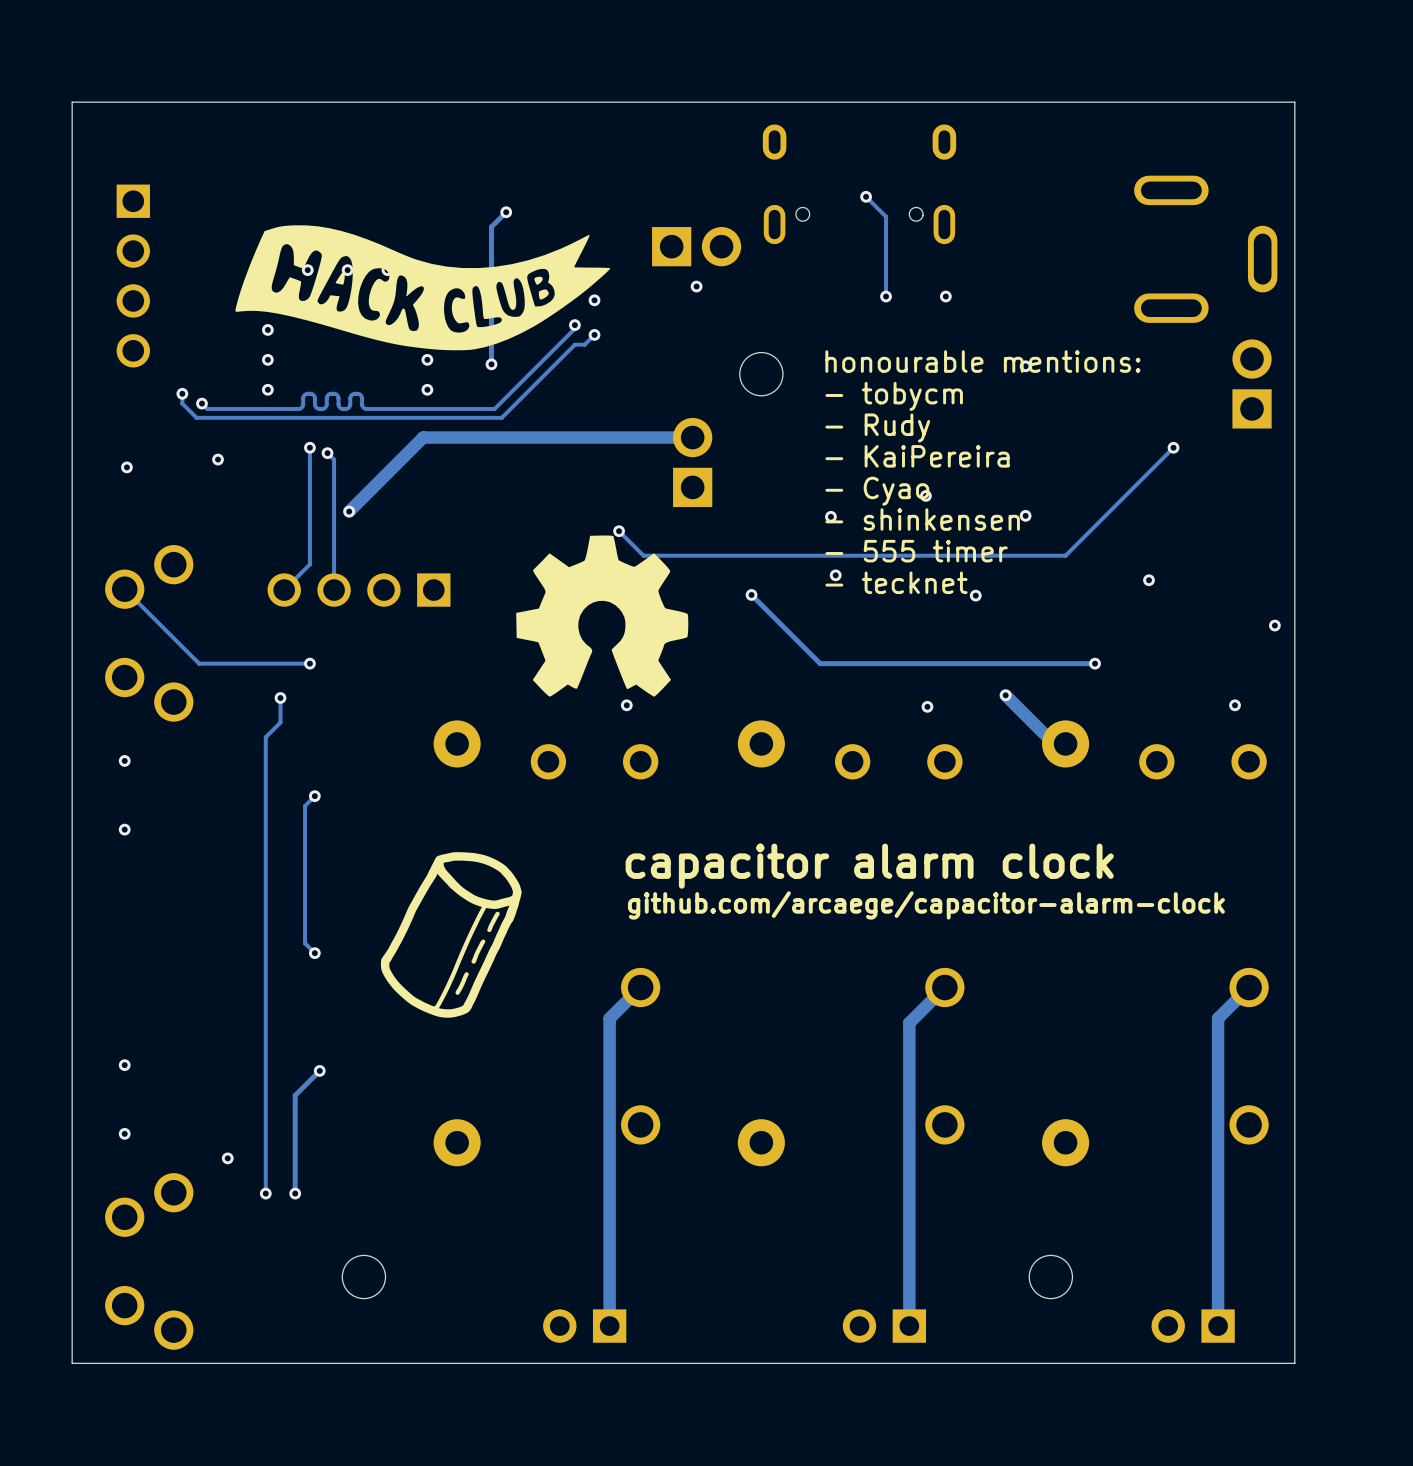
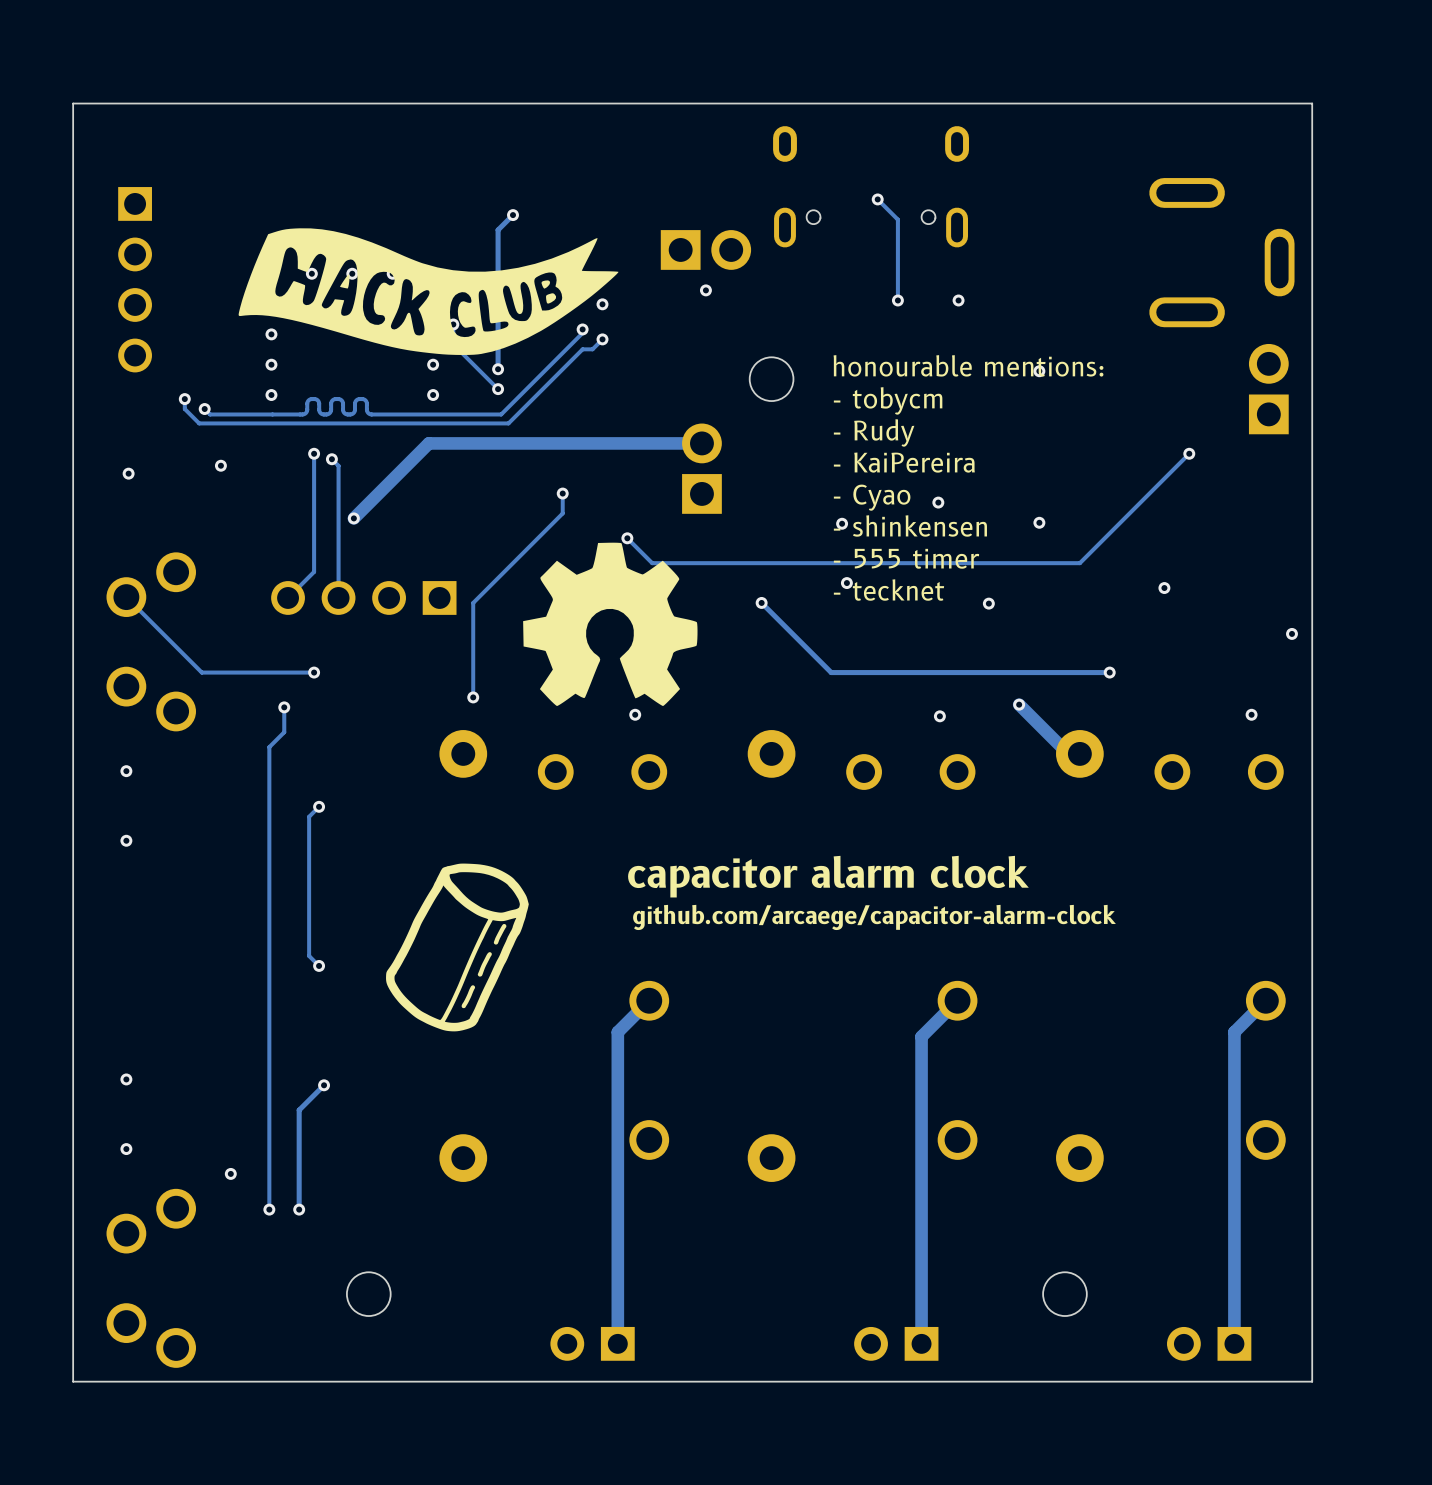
track: none -> (453, 324) (453, 344) (498, 389)
via: none -> (453, 324)
via: none -> (498, 389)
track: none -> (562, 493) (562, 513) (473, 602) (473, 697)
via: none -> (562, 493)
via: none -> (473, 697)

